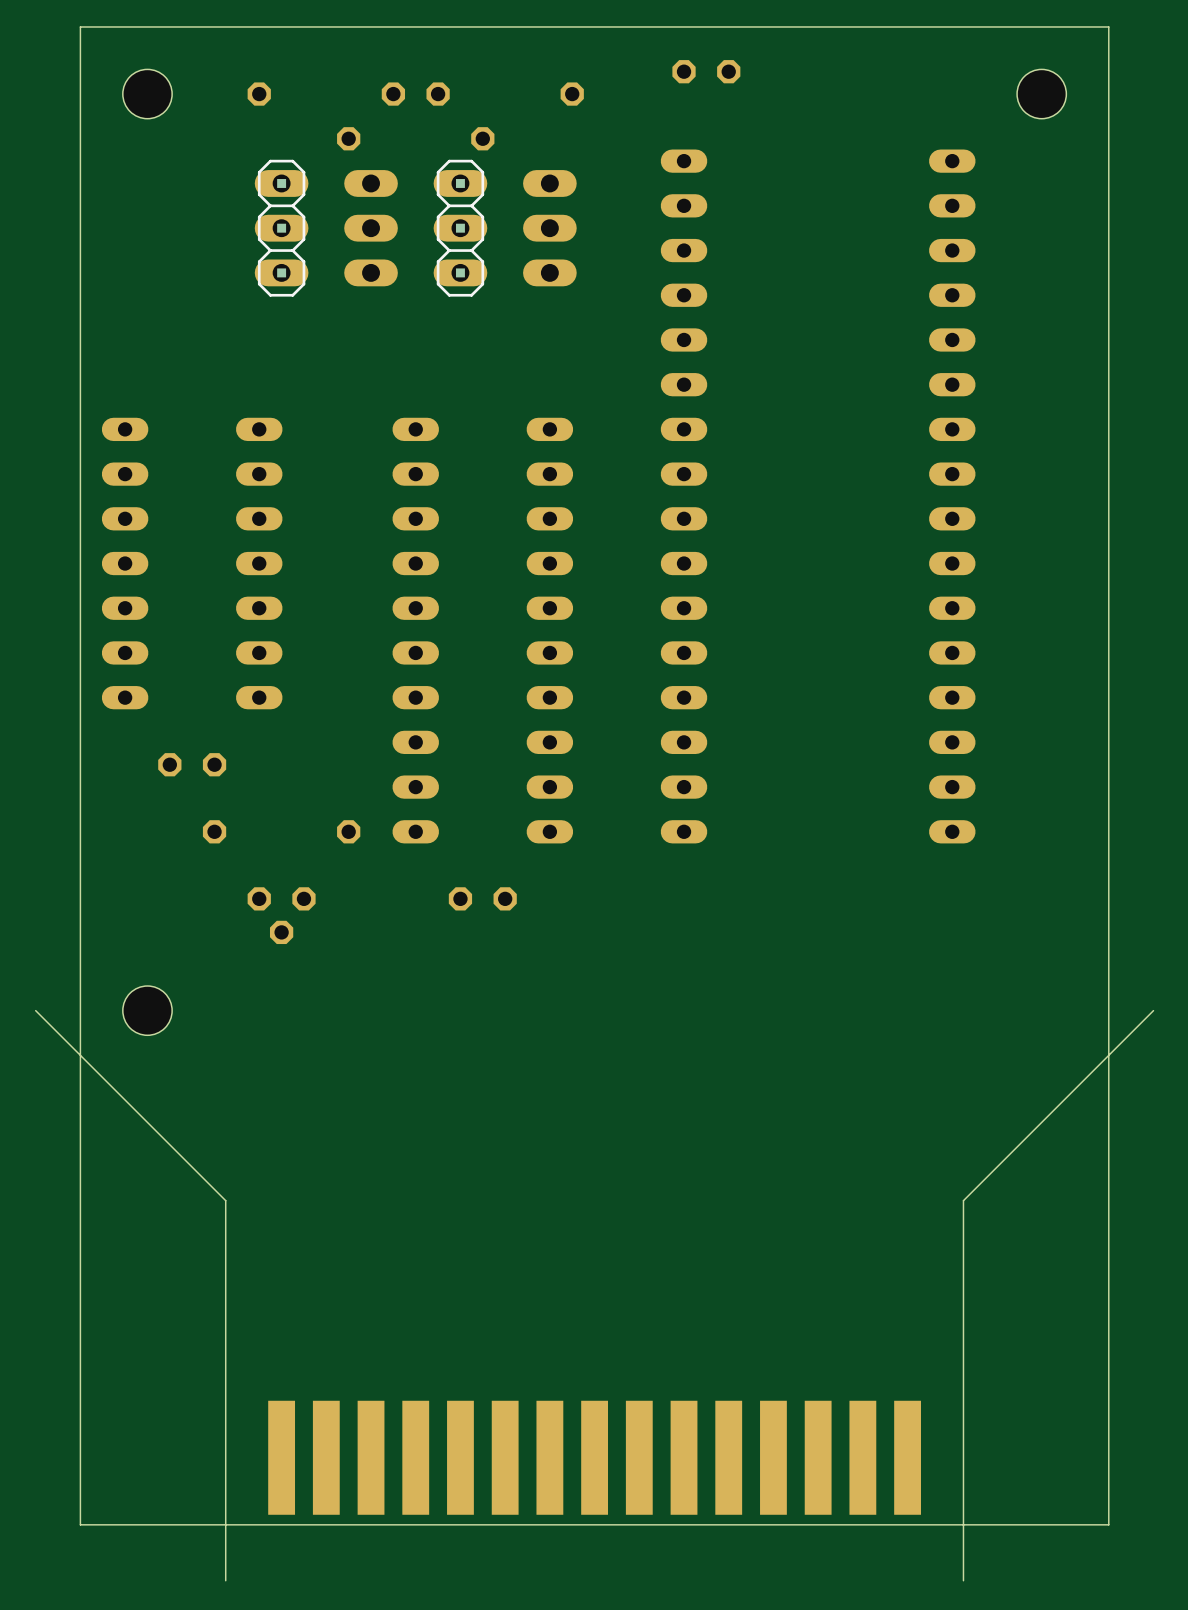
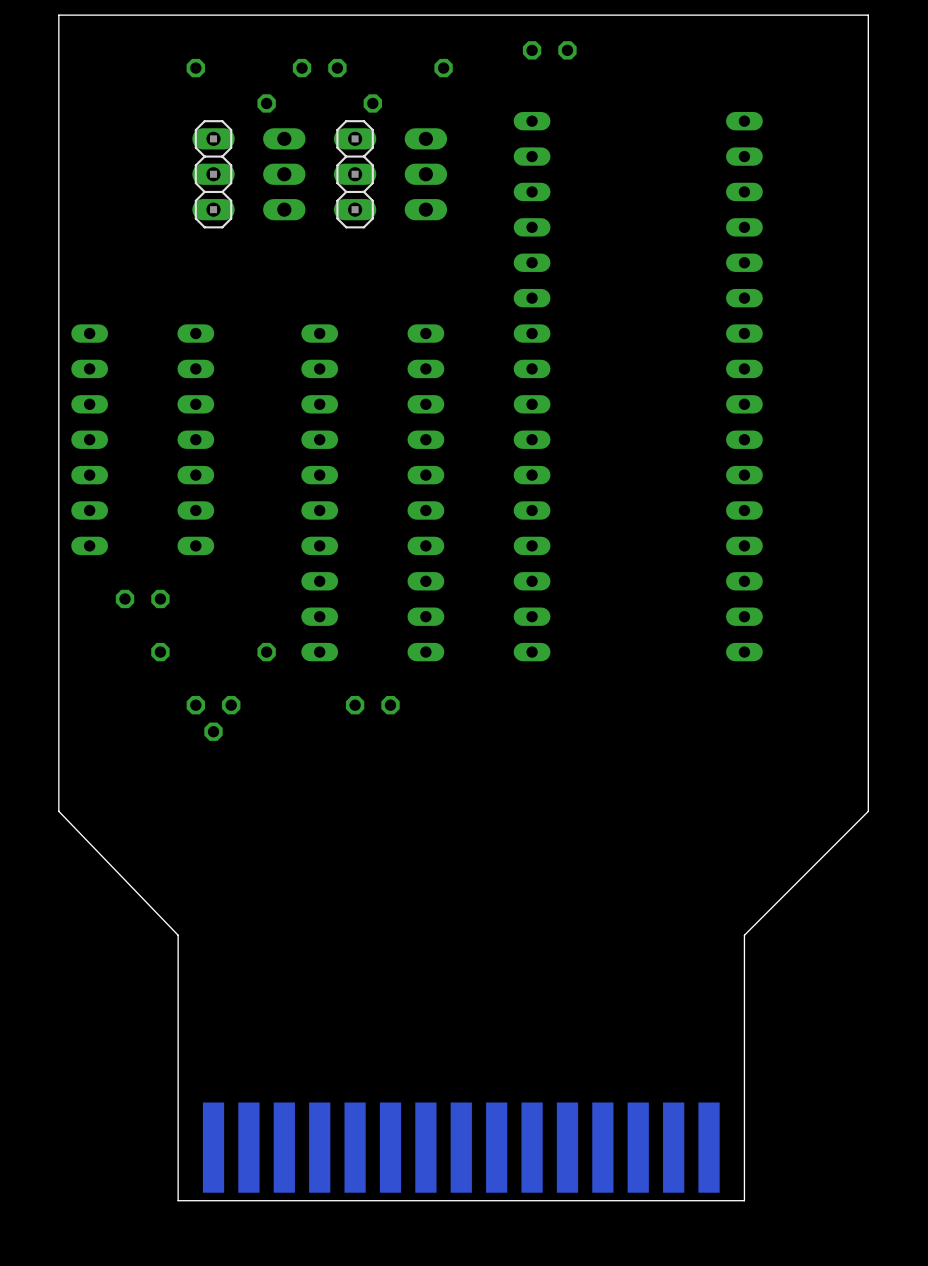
board edge: (1108, 26) (80, 26) (80, 1524) (236, 1524) -> (868, 15) (58, 15) (58, 811) (178, 935) (178, 1200)
hole: (147, 94) -> none
hole: (1041, 94) -> none
board edge: (35, 1010) (225, 1200) (225, 1580) -> none
hole: (147, 1010) -> none
board edge: (1153, 1010) (963, 1200) (963, 1580) -> none
board edge: (1108, 1033) (1108, 1524) (952, 1524) -> (868, 811) (744, 935) (744, 1200)

